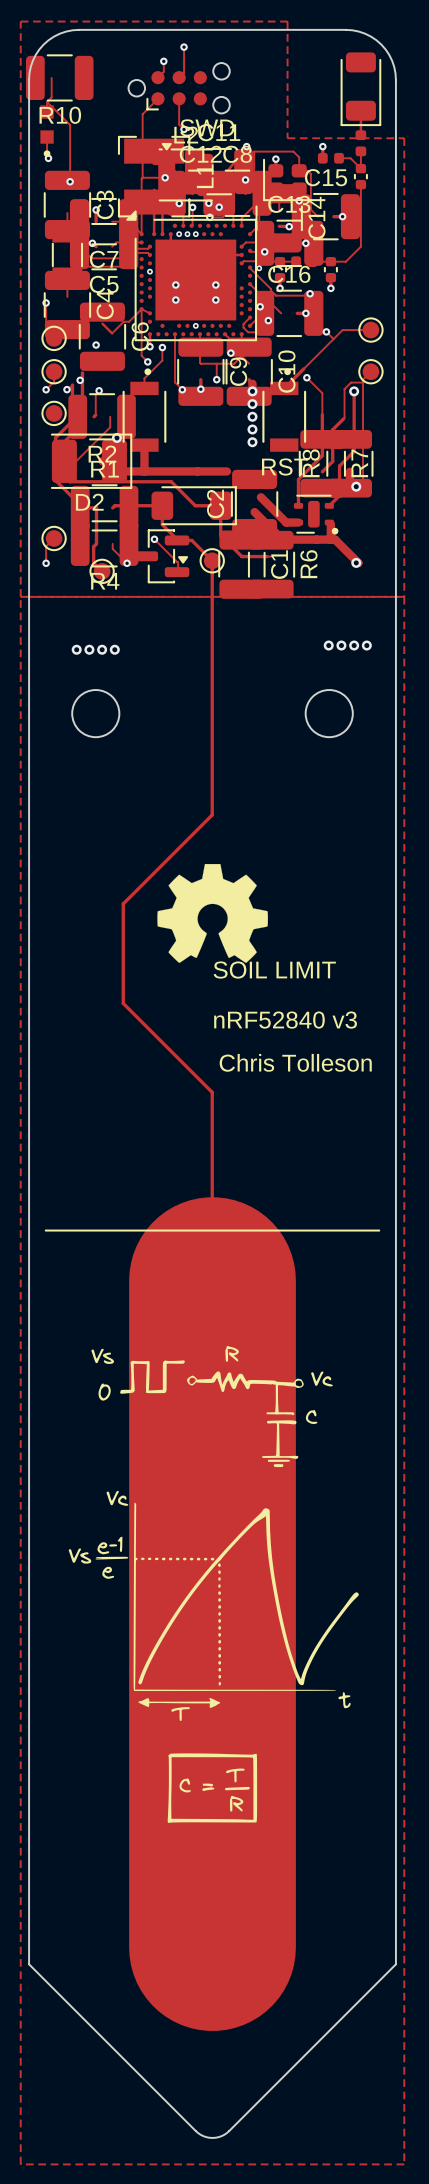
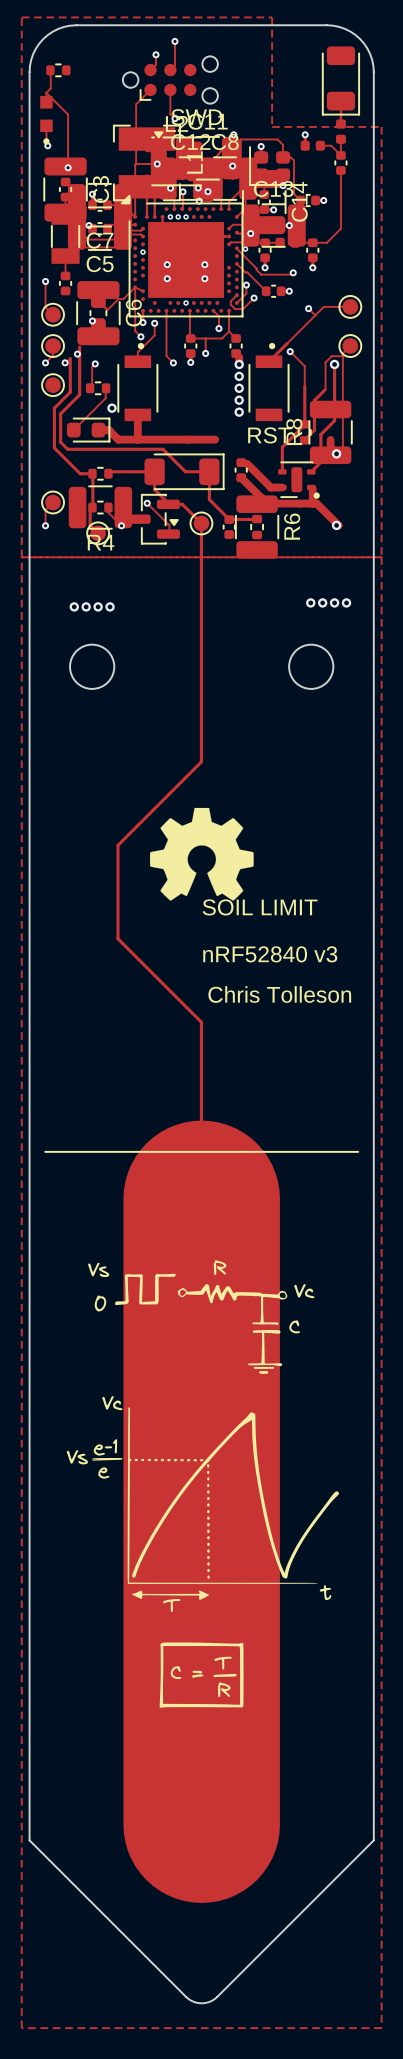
R10: (59, 77) -> none
part: none -> (58, 70)
part: none -> (65, 189)
C15: (325, 216) -> none
part: none -> (308, 200)
part: none -> (264, 202)
part: none -> (99, 205)
part: none -> (99, 228)
C4: (67, 305) -> none
part: none -> (65, 283)
C16: (289, 313) -> none
part: none -> (273, 291)
part: none -> (98, 313)
C9: (200, 371) -> none
part: none -> (190, 346)
C10: (249, 371) -> none
part: none -> (236, 346)
R2: (102, 416) -> none
part: none -> (98, 388)
D2: (91, 461) -> none
part: none -> (88, 430)
R7: (322, 463) -> none
part: none -> (304, 432)
C2: (254, 504) -> none
part: none -> (241, 470)
R1: (104, 507) -> none
part: none -> (100, 473)
part: none -> (100, 507)
C1: (241, 564) -> none
part: none -> (229, 527)
part: none -> (257, 527)

